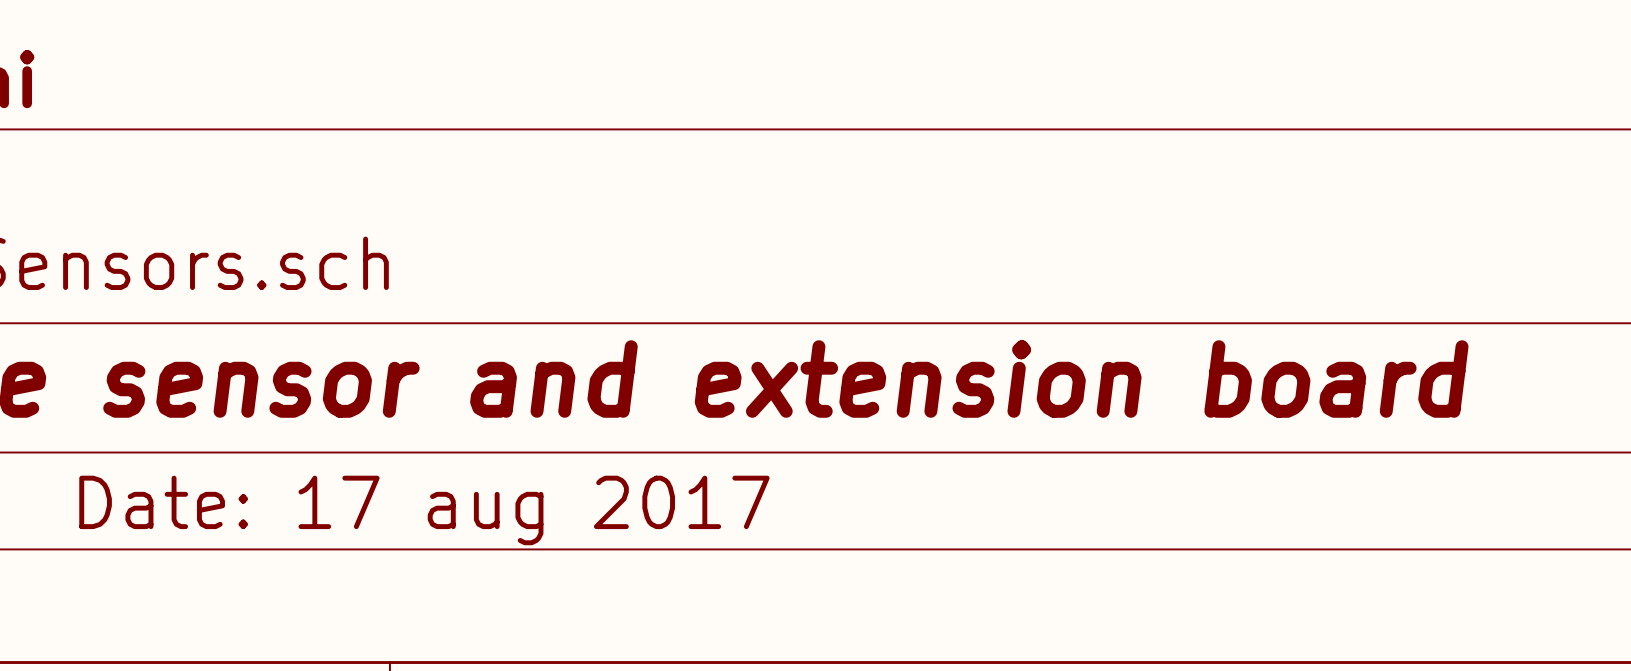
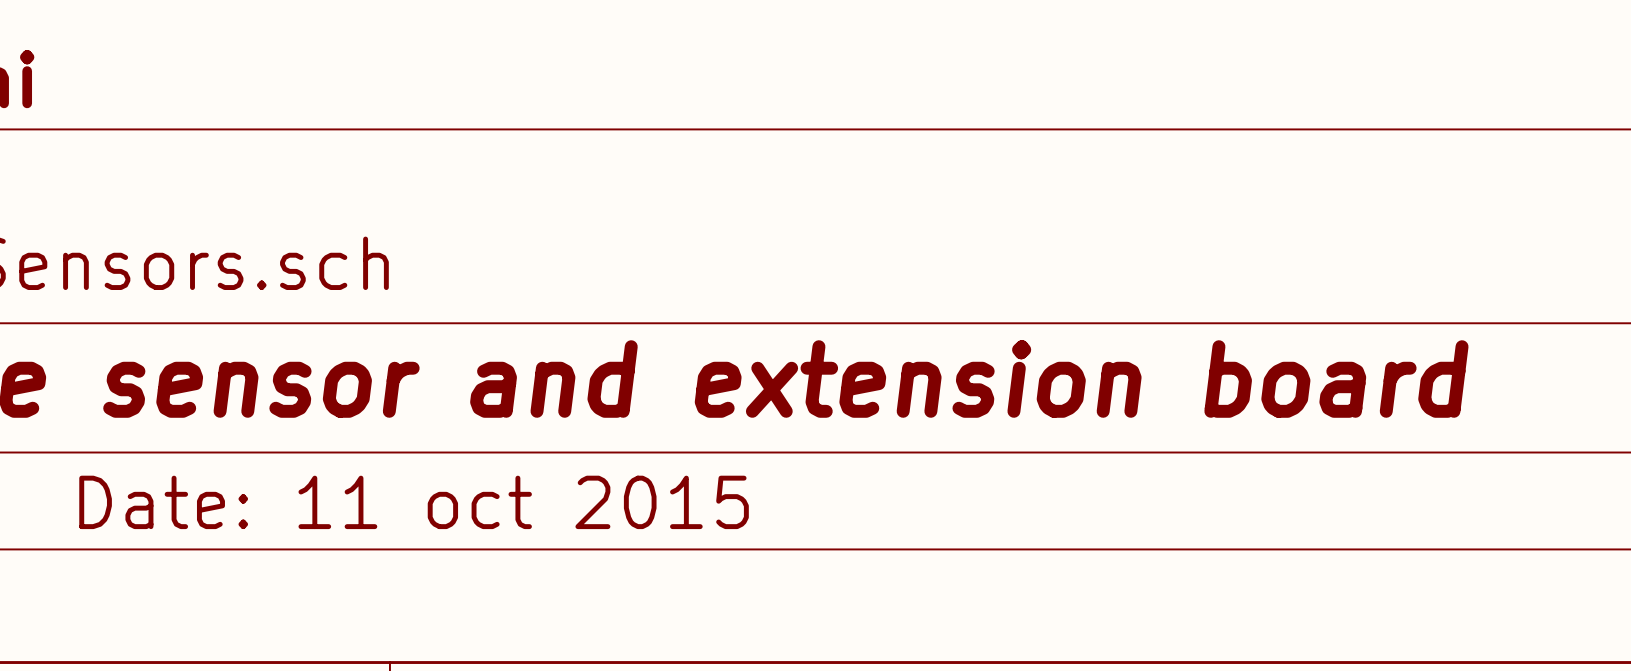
title block: Date: 17 aug 2017 (424, 510) -> Date: 11 oct 2015 (414, 502)

